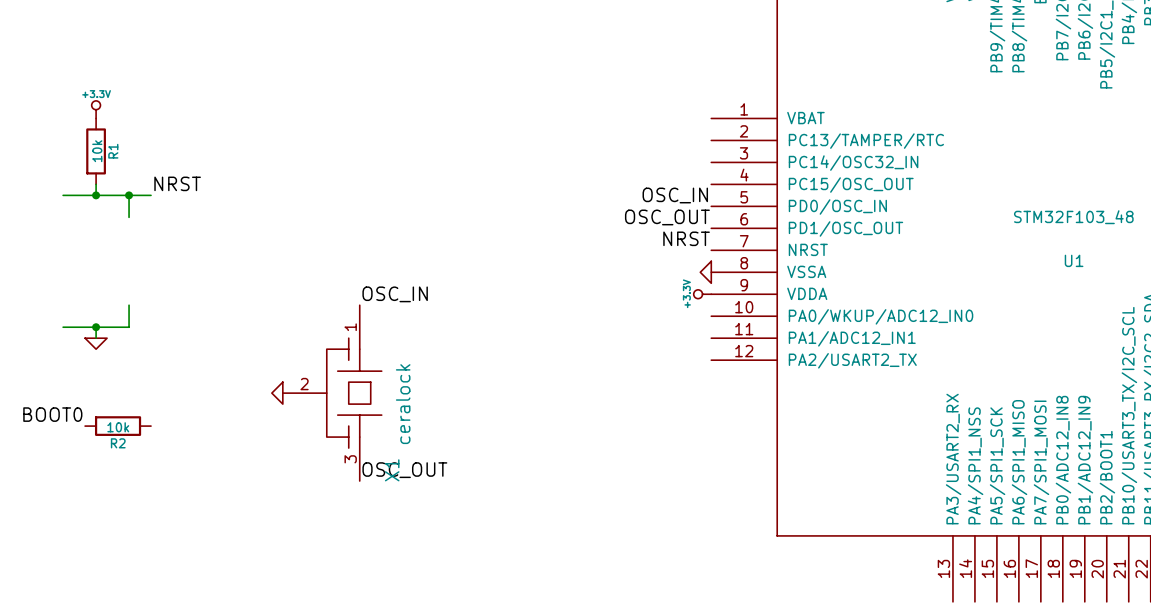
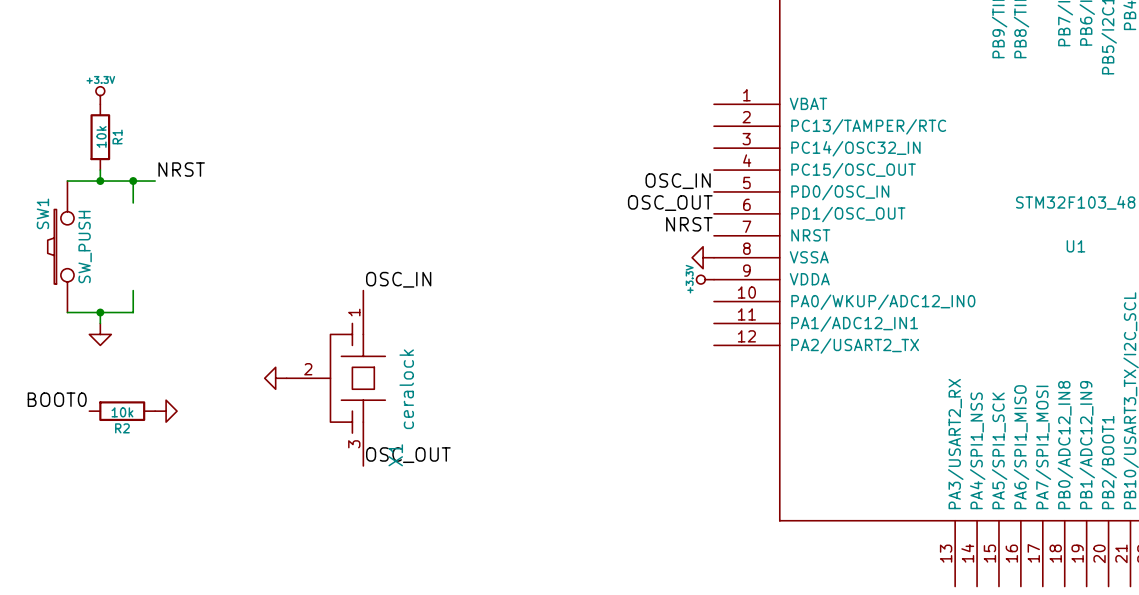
SW1: none -> SW_PUSH (60, 246)
power symbol shape: [700, 261, 712, 284] -> [692, 246, 715, 269]
power symbol shape: [85, 338, 108, 350] -> [89, 323, 112, 346]
power symbol shape: [271, 382, 283, 405] -> [264, 367, 287, 390]
power symbol: none -> (166, 411)

